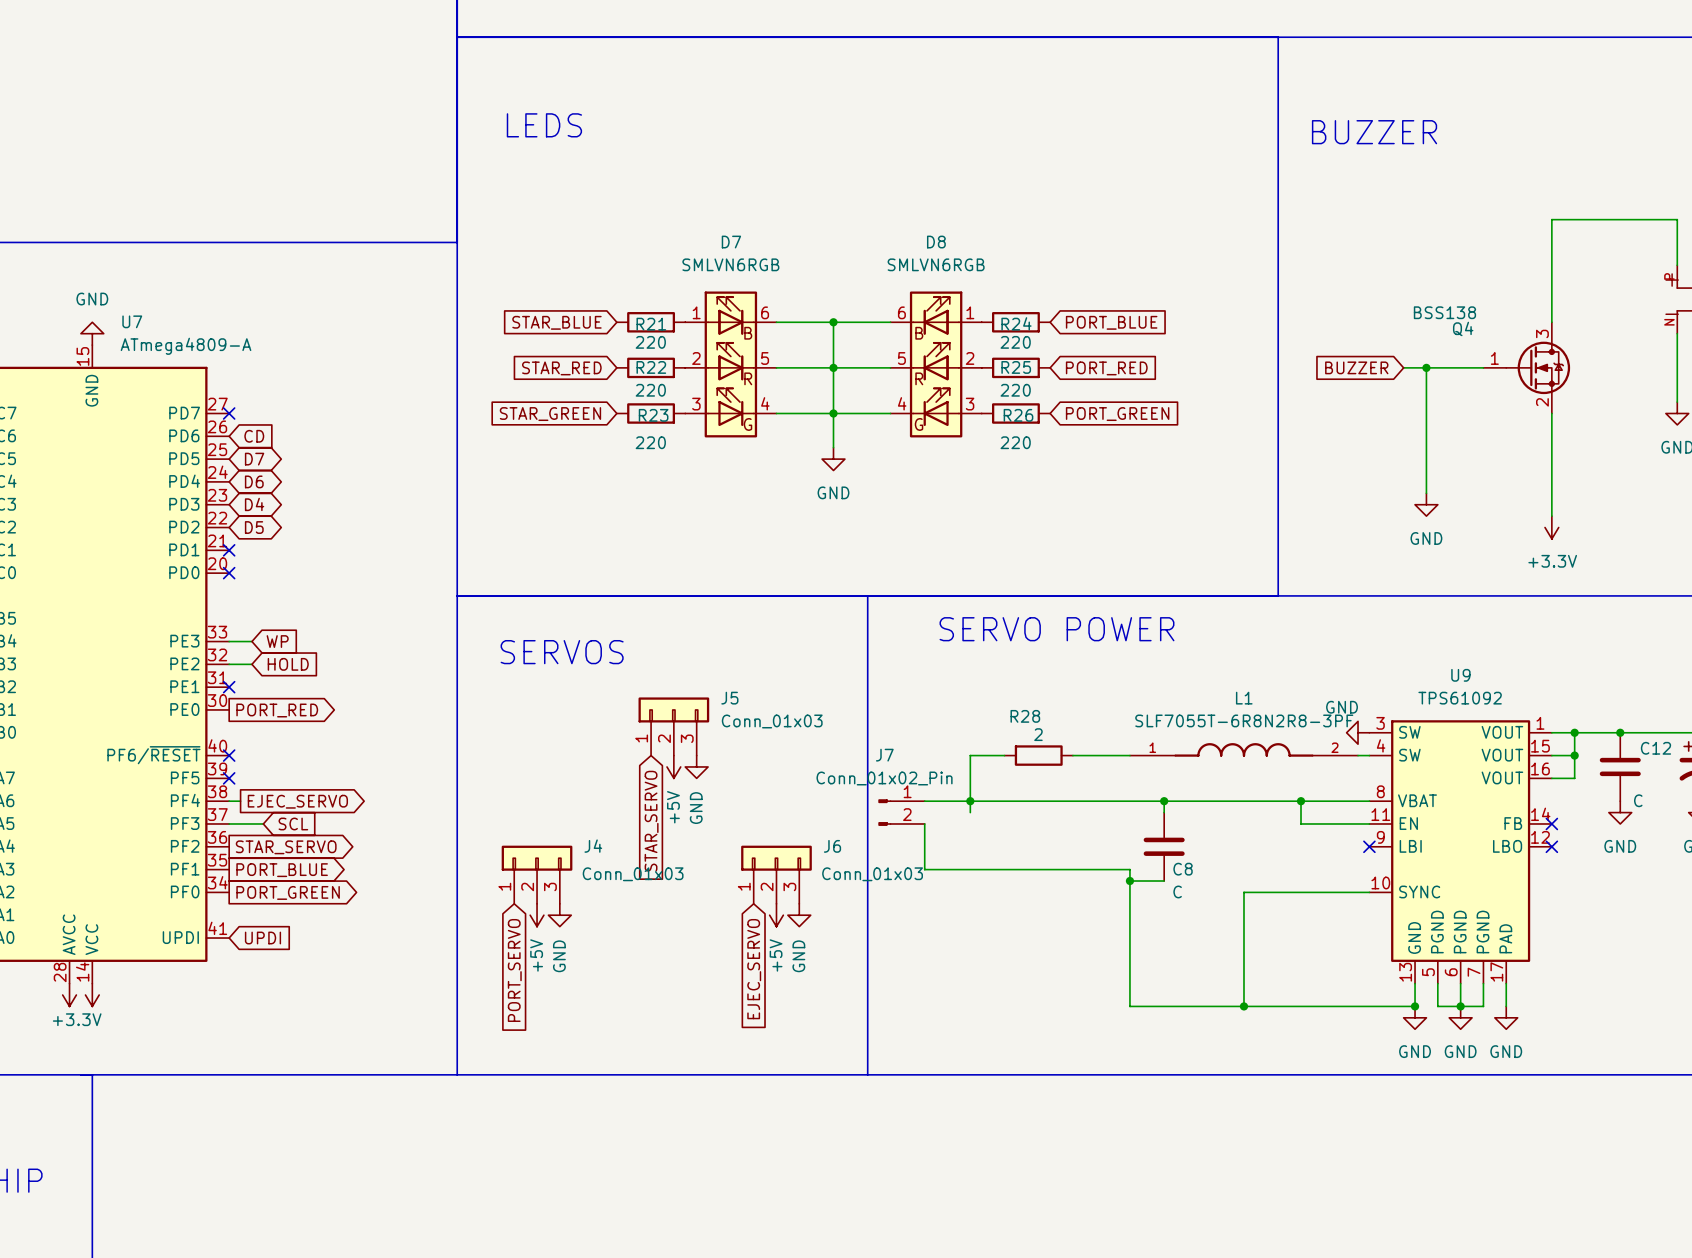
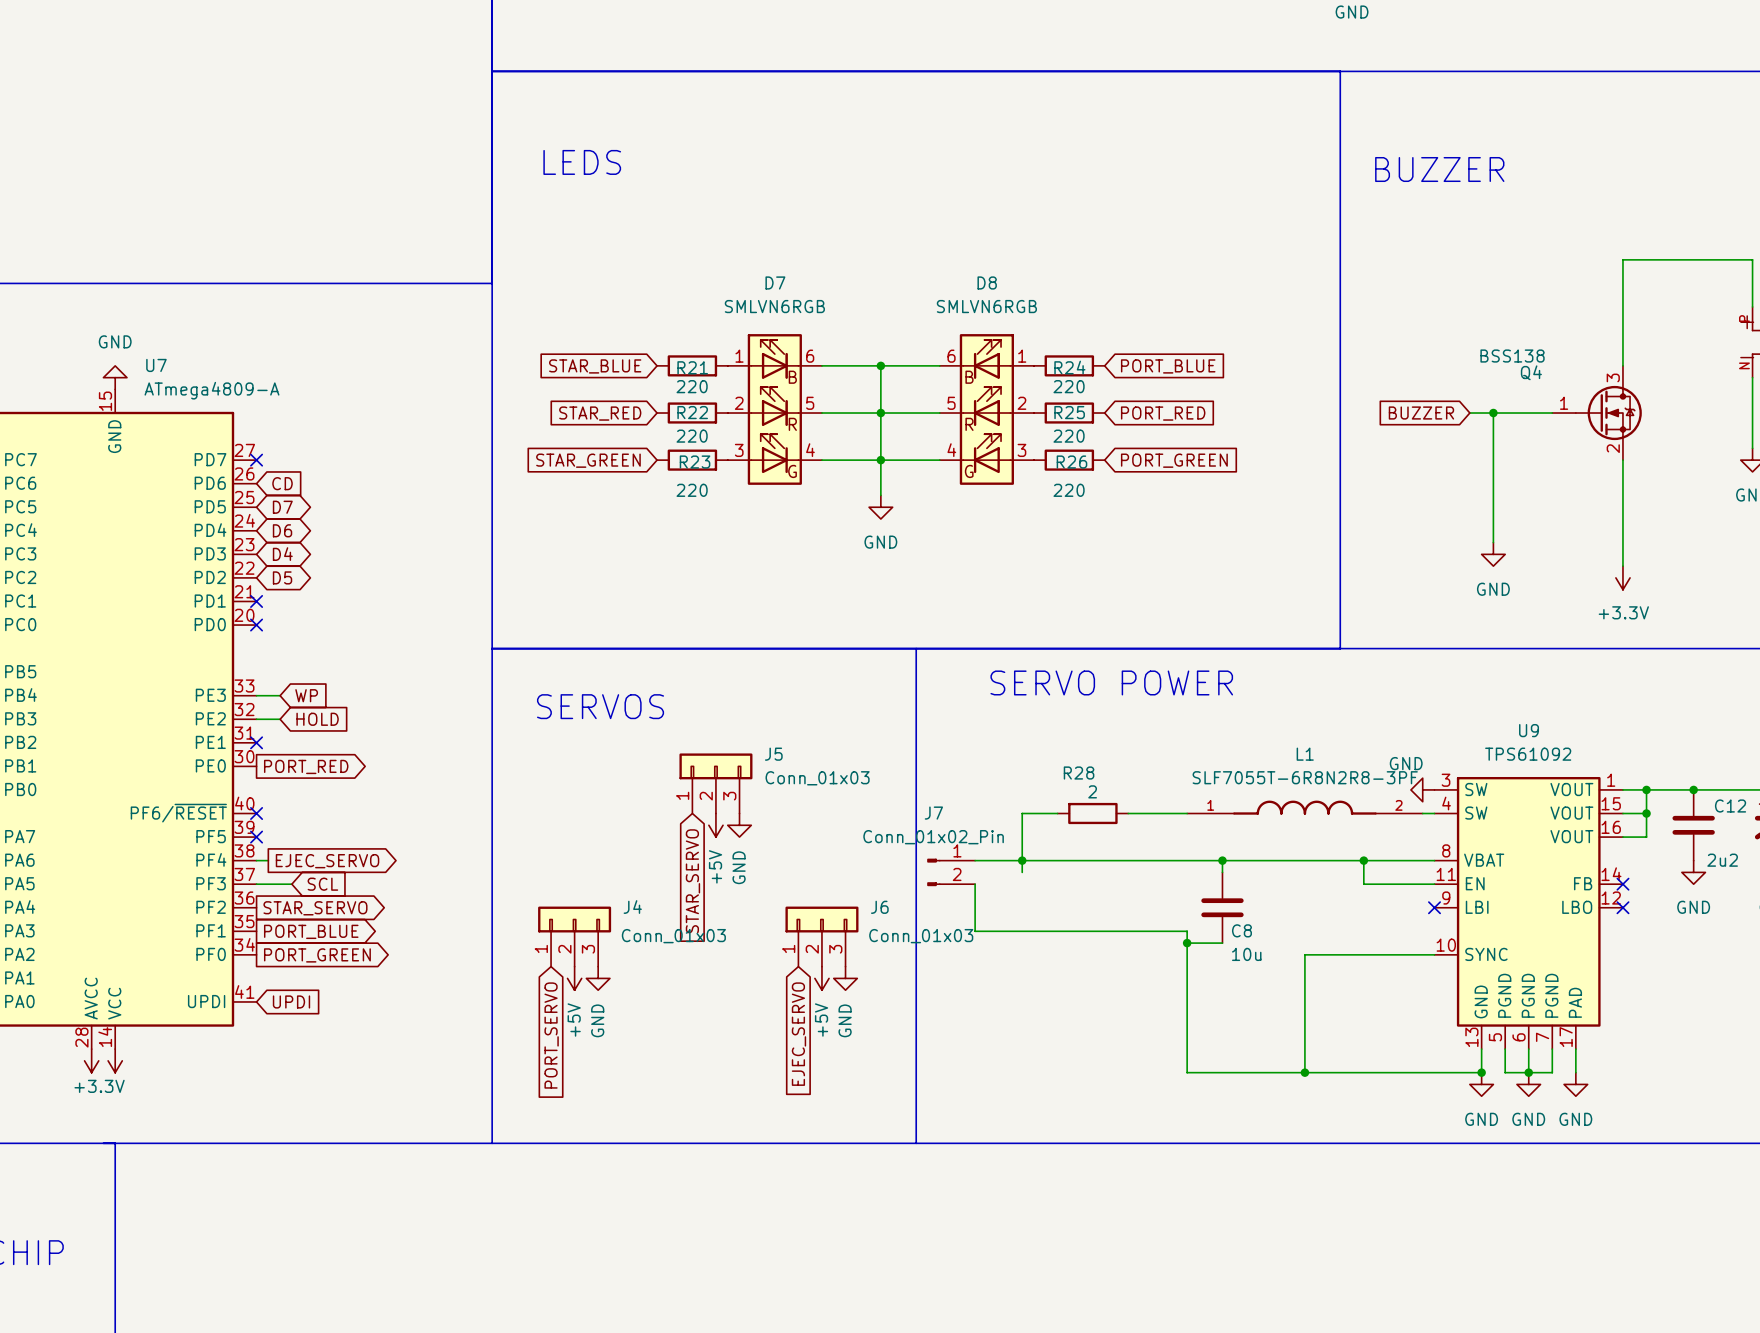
C12 value: C (1638, 800) -> 2u2 (1722, 860)
C8 value: C (1177, 891) -> 10u (1246, 954)

